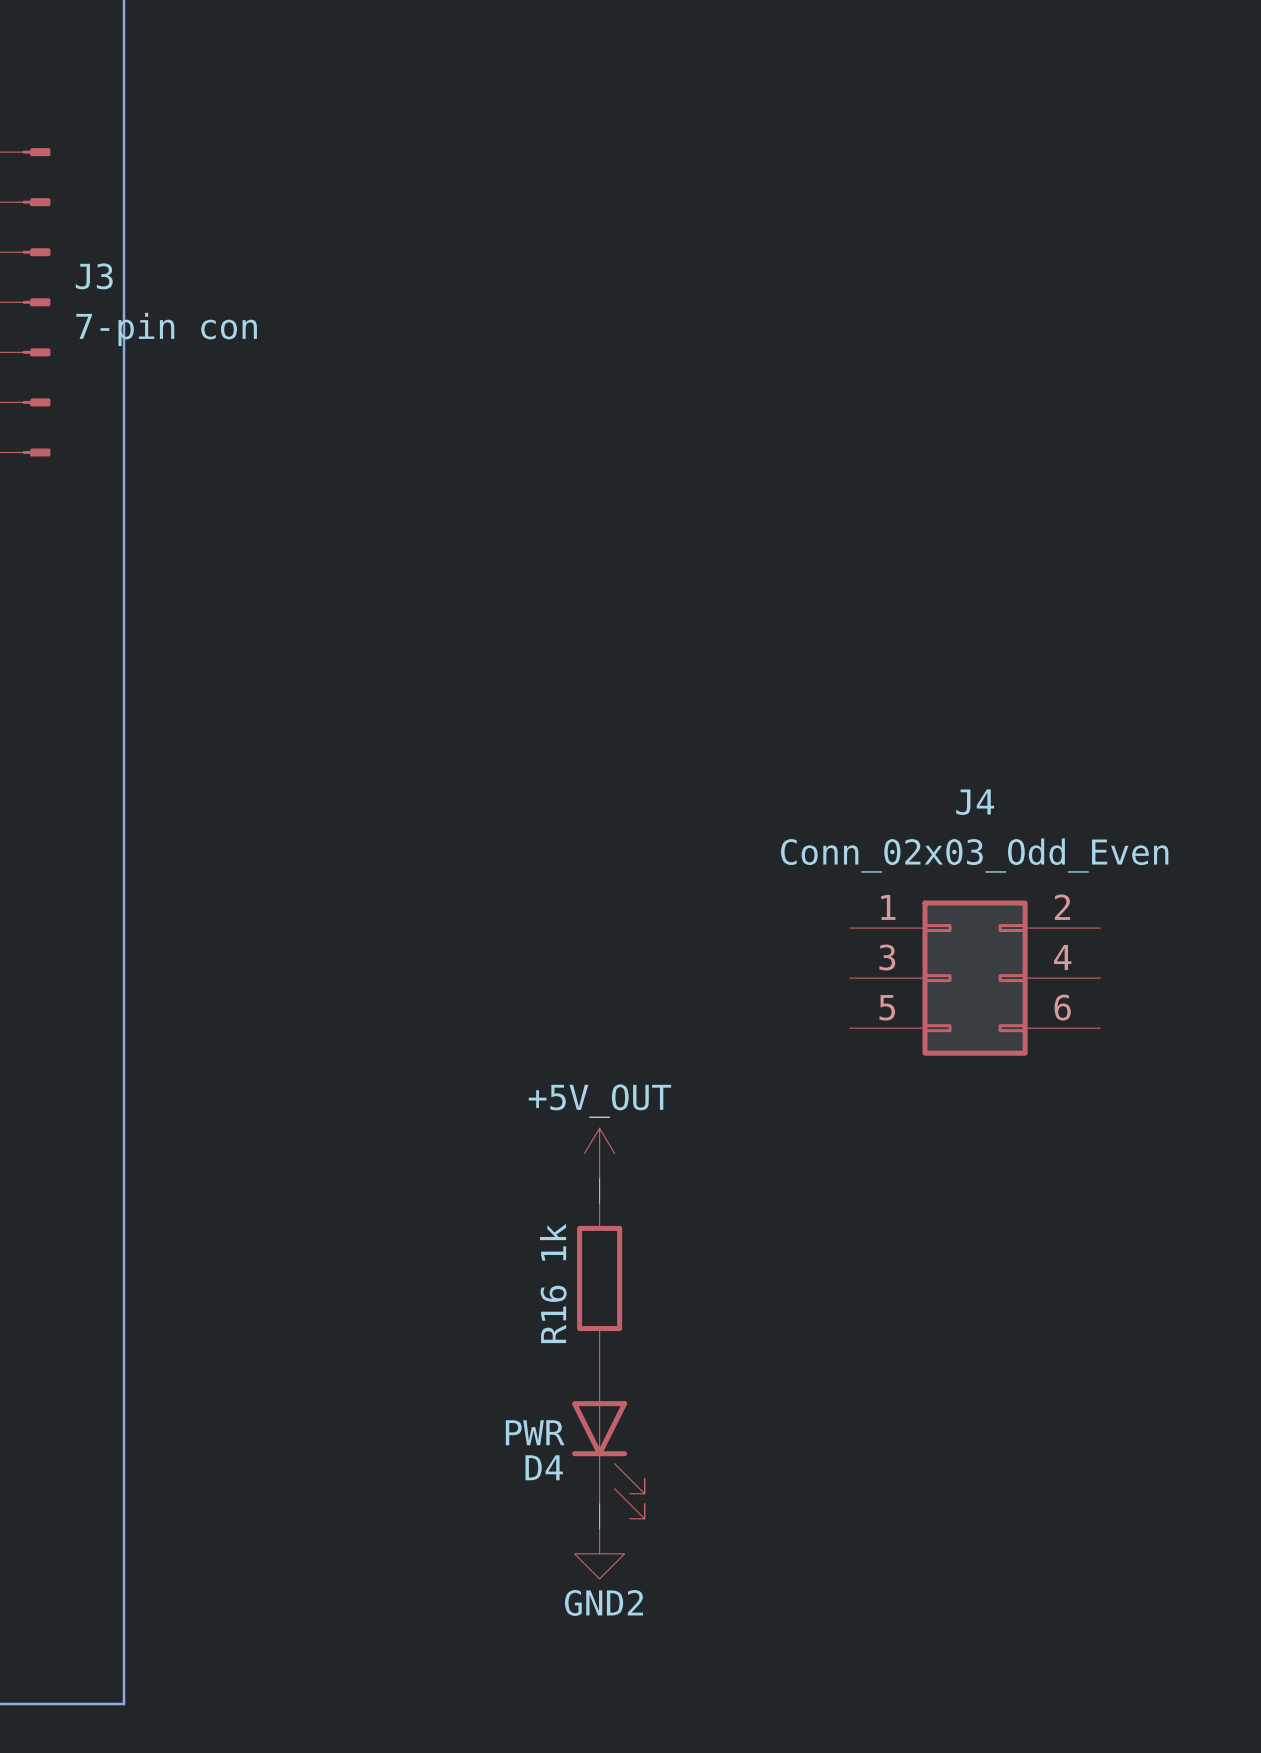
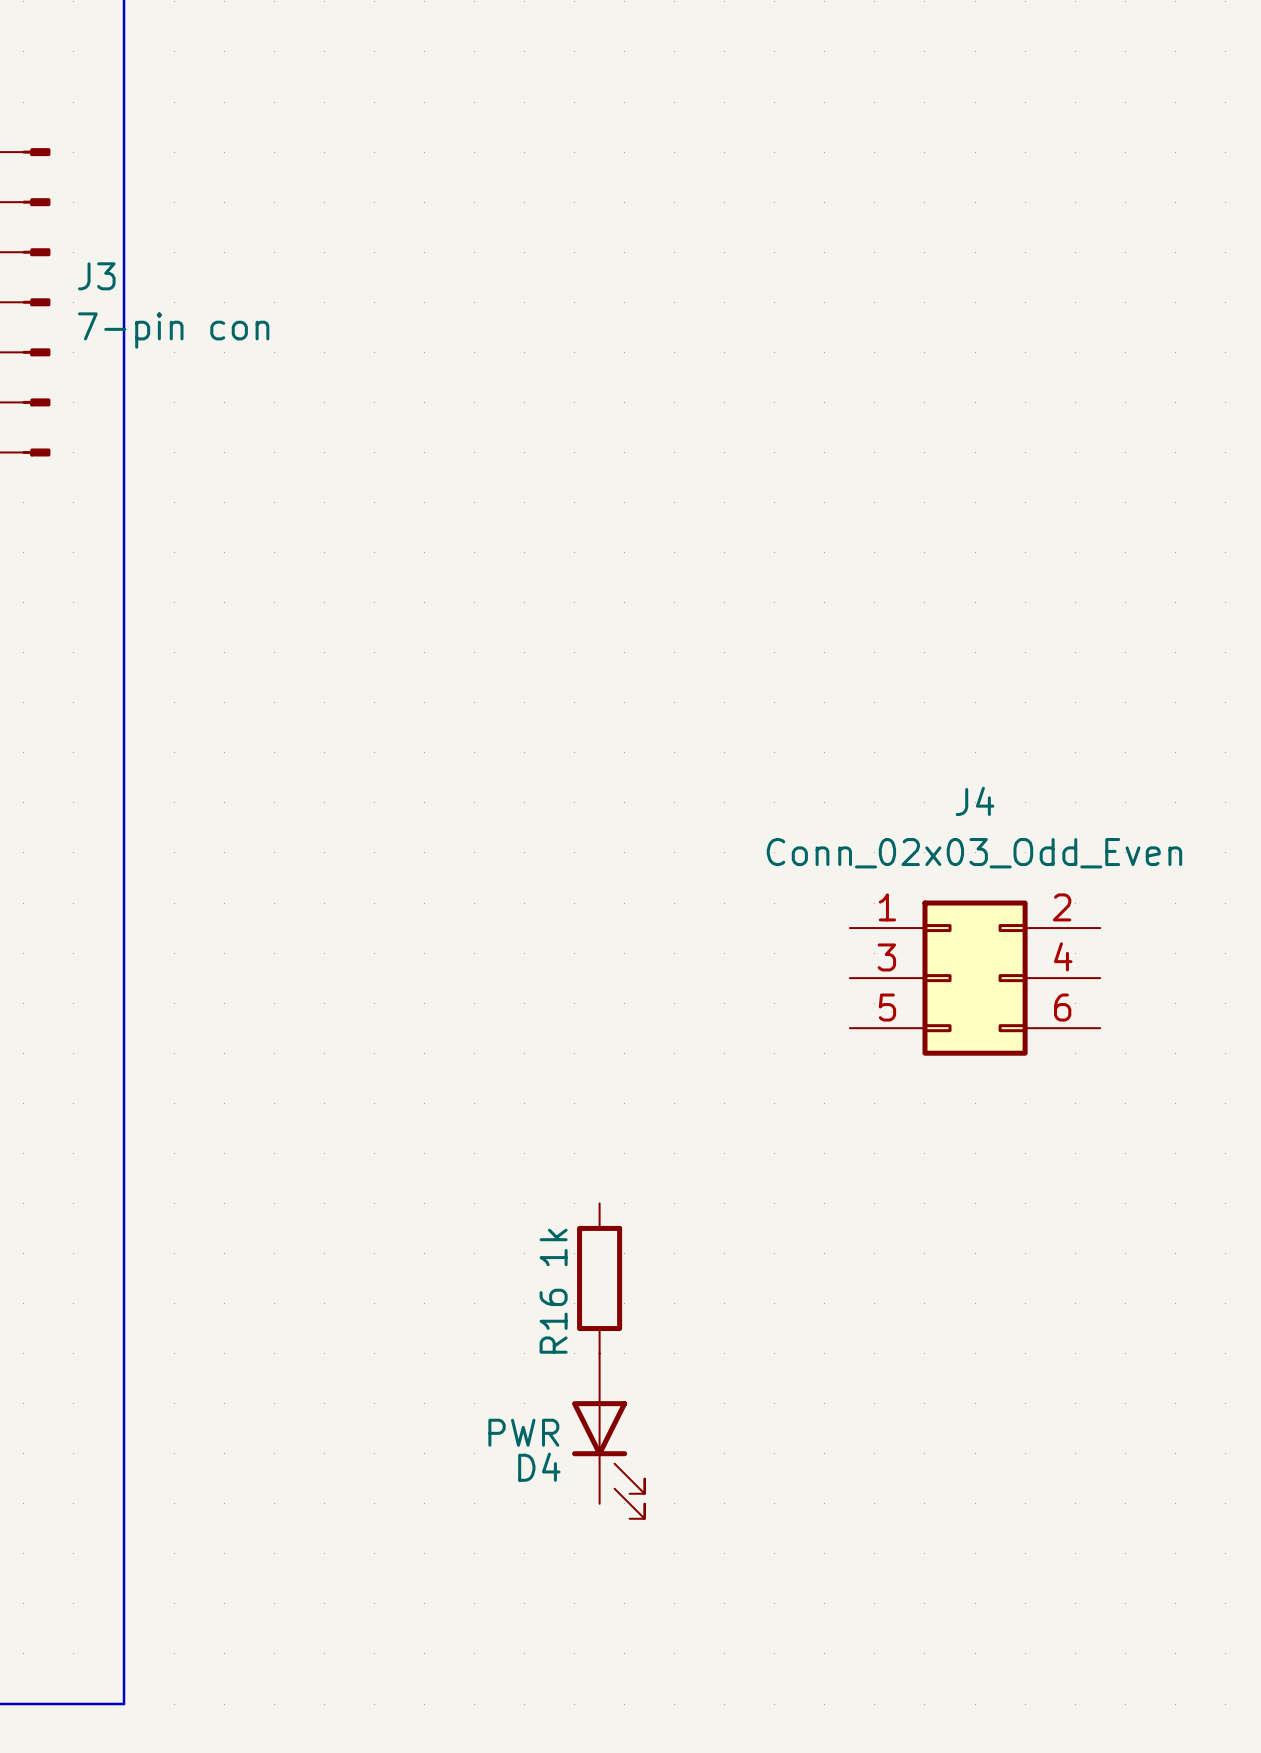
power symbol: +5V_OUT (599, 1153) -> none
wire: (599, 1178) (599, 1203) -> none
wire: (599, 1503) (599, 1528) -> none
power symbol: GND2 (599, 1553) -> none

